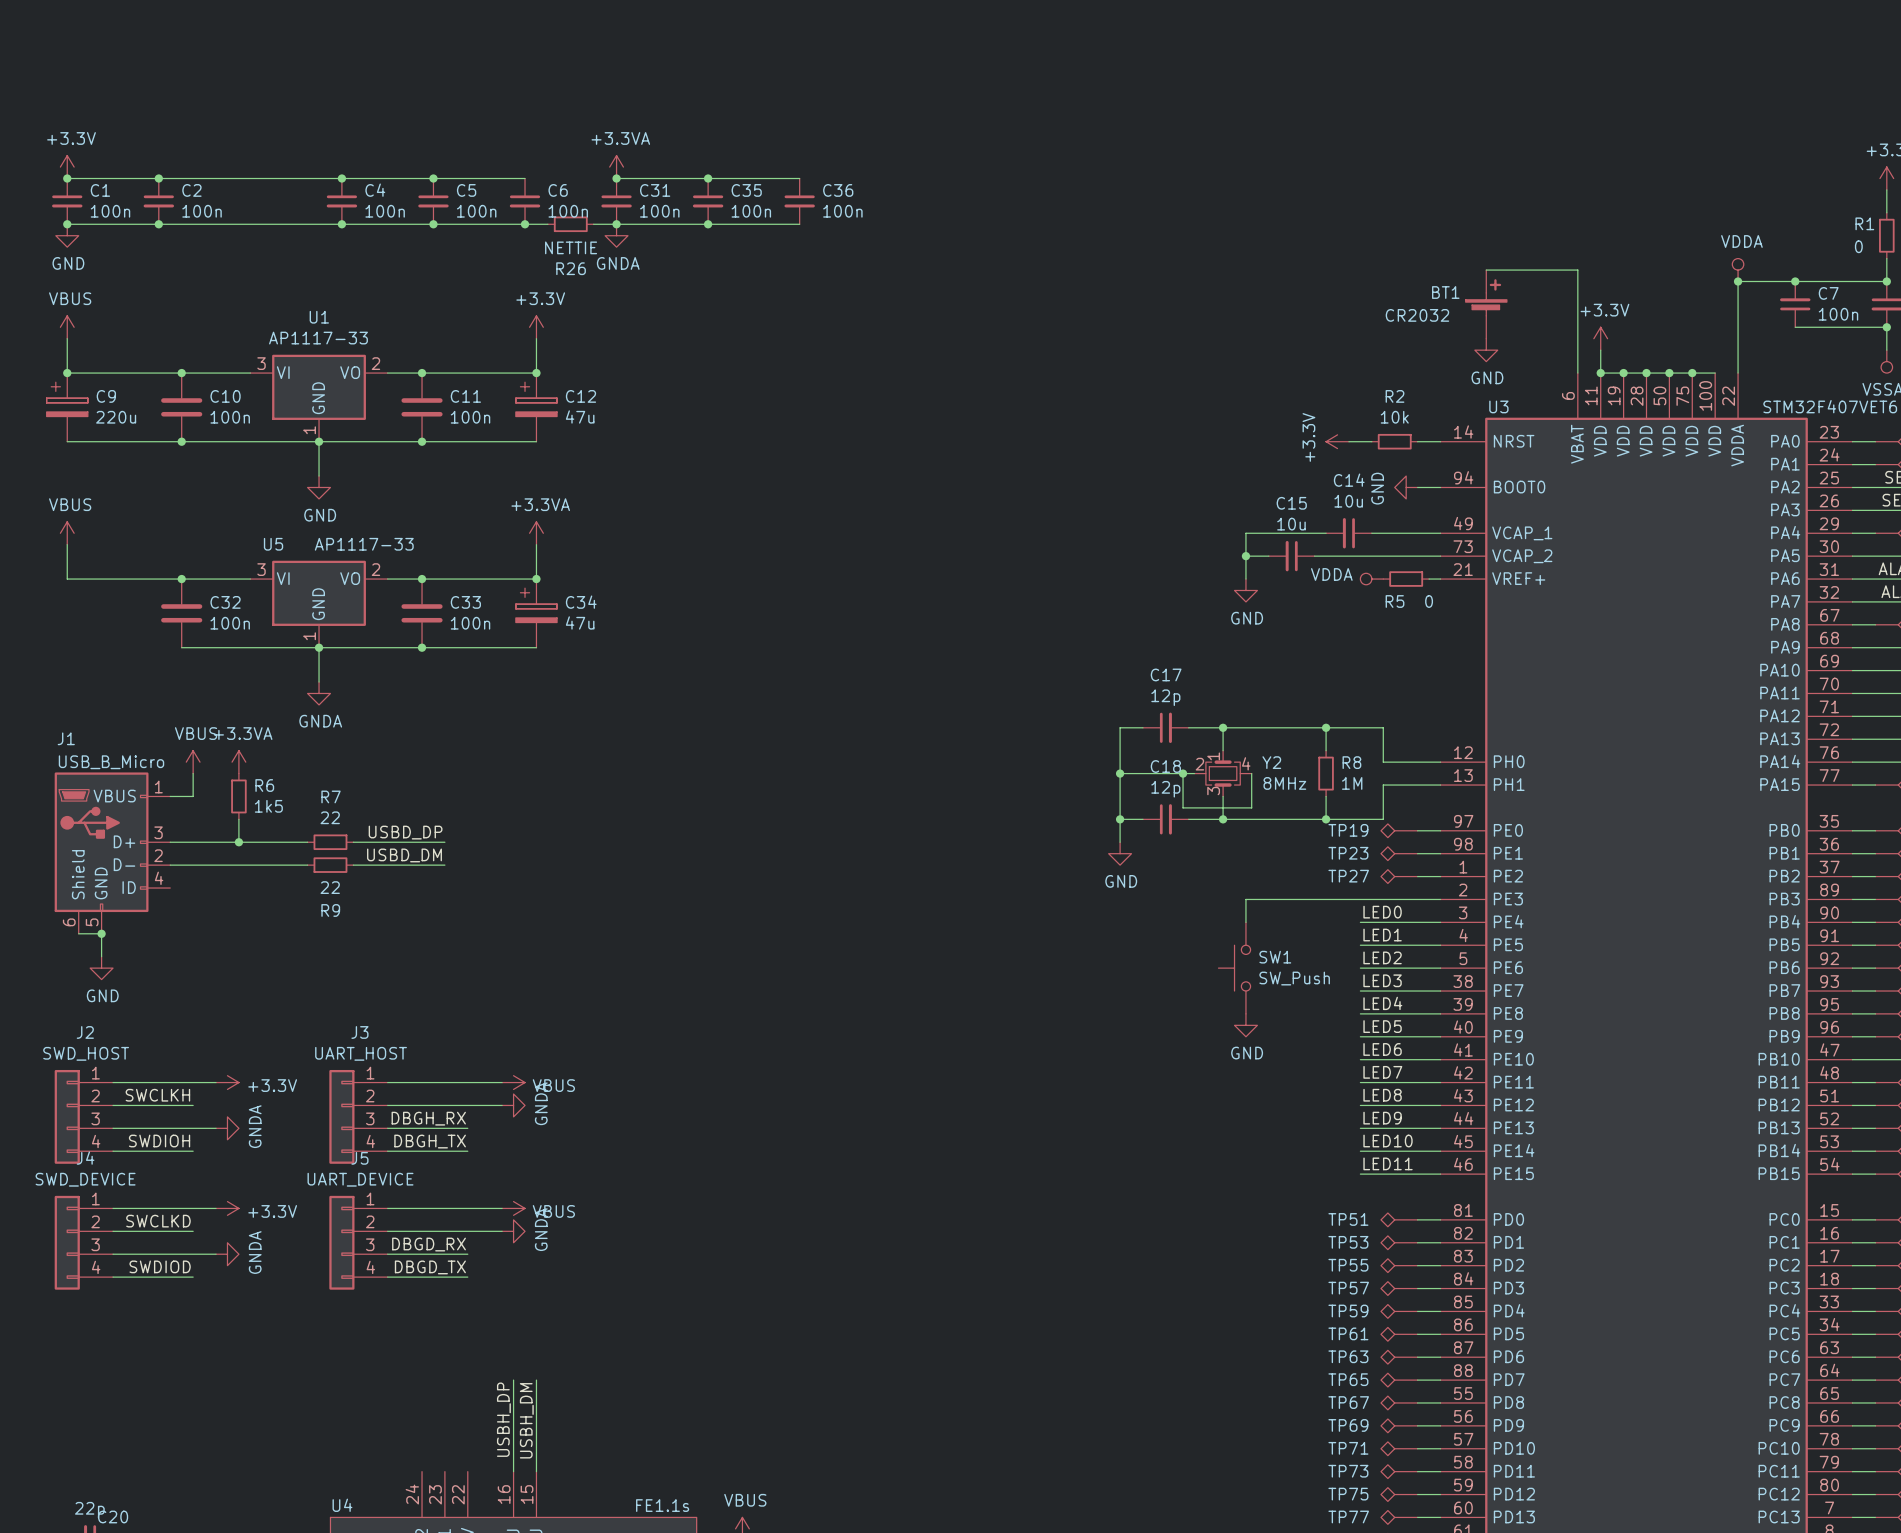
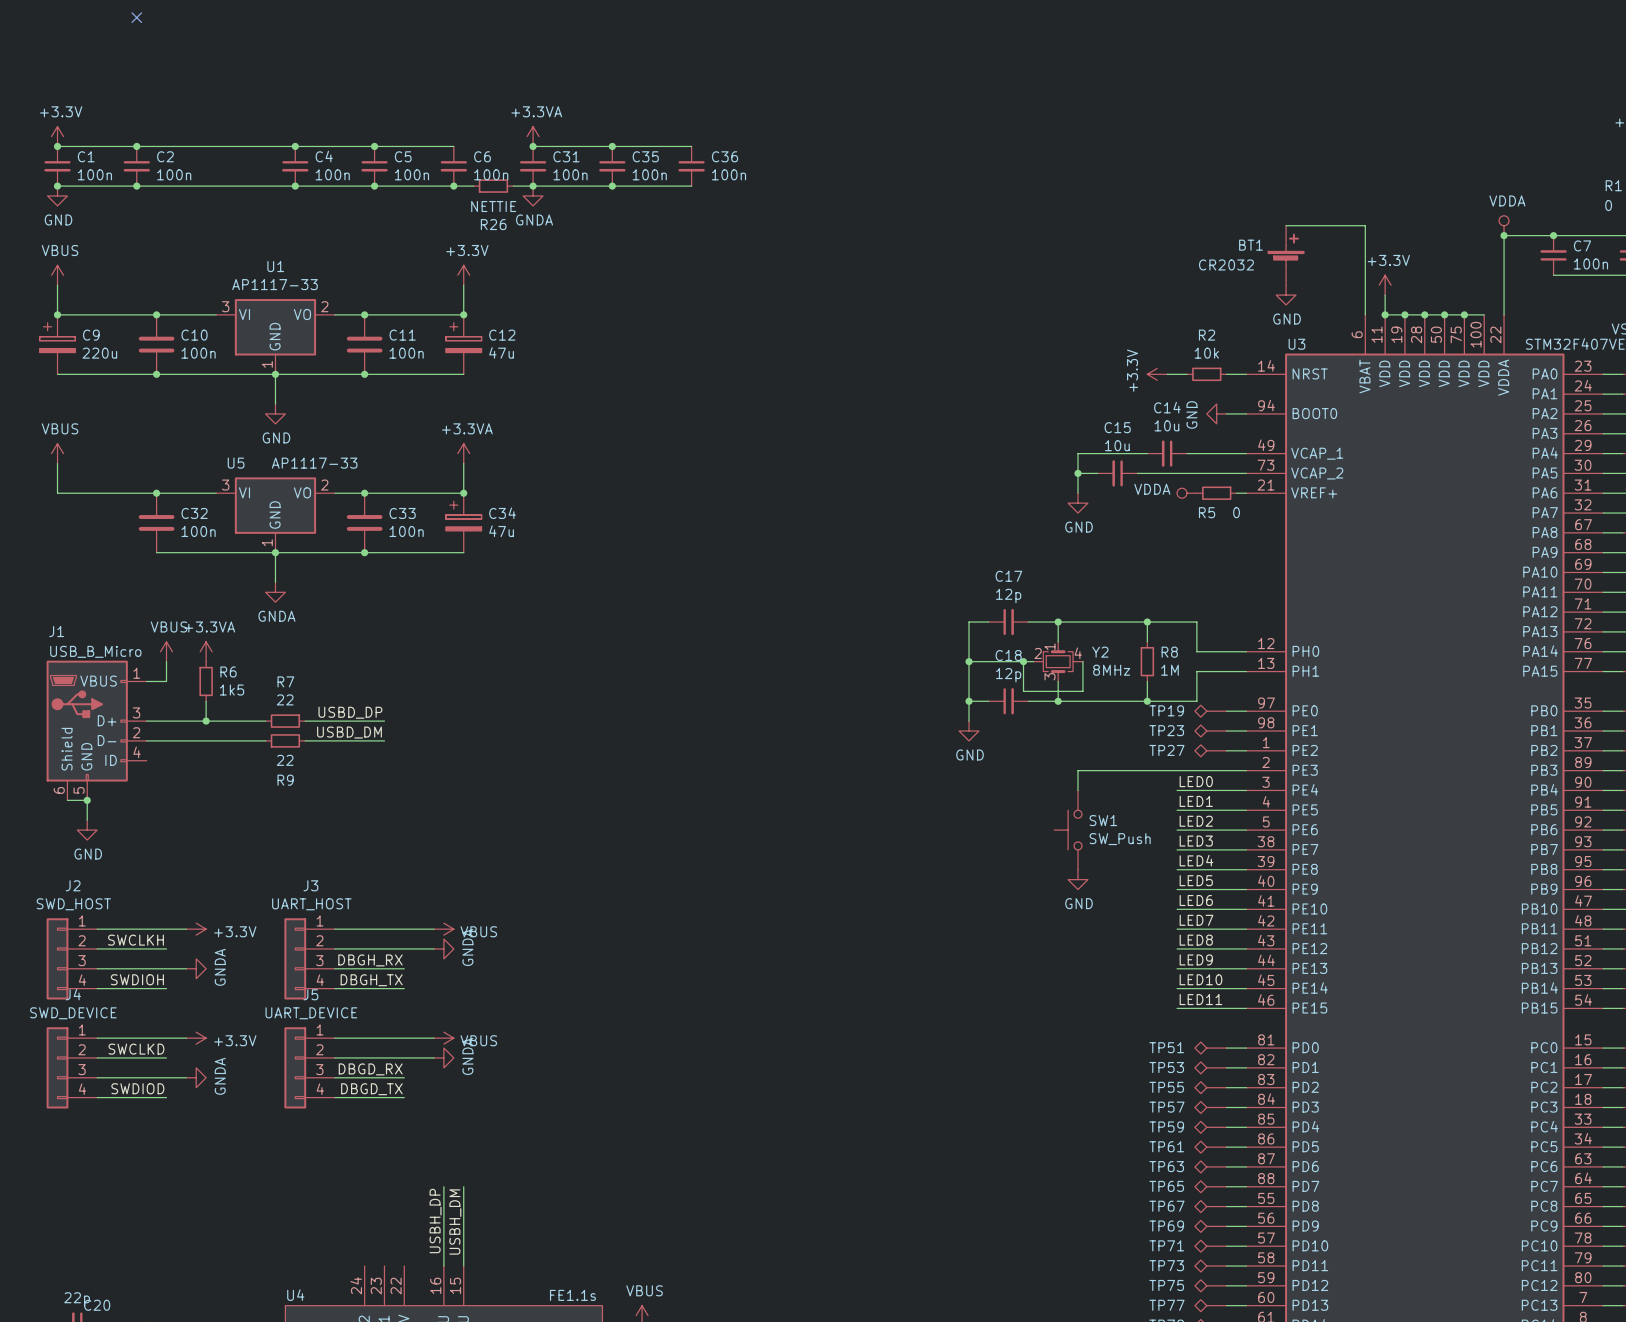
no-connect mark: none -> (136, 17)

